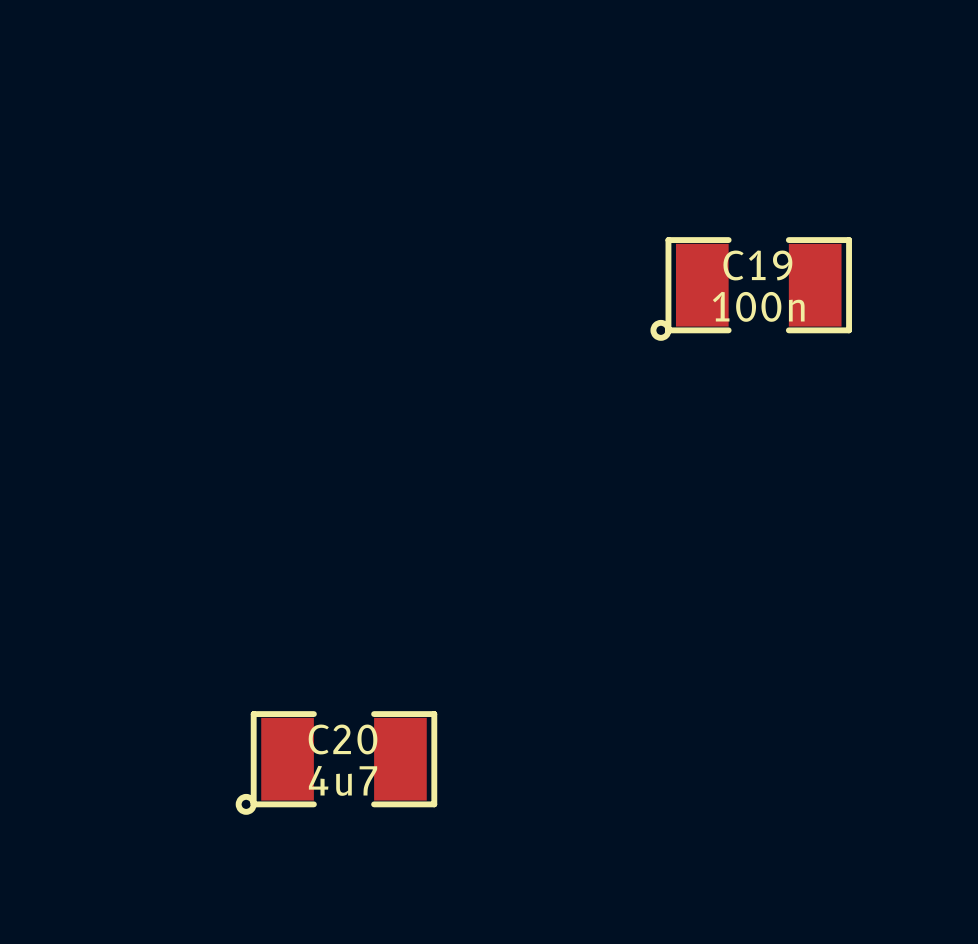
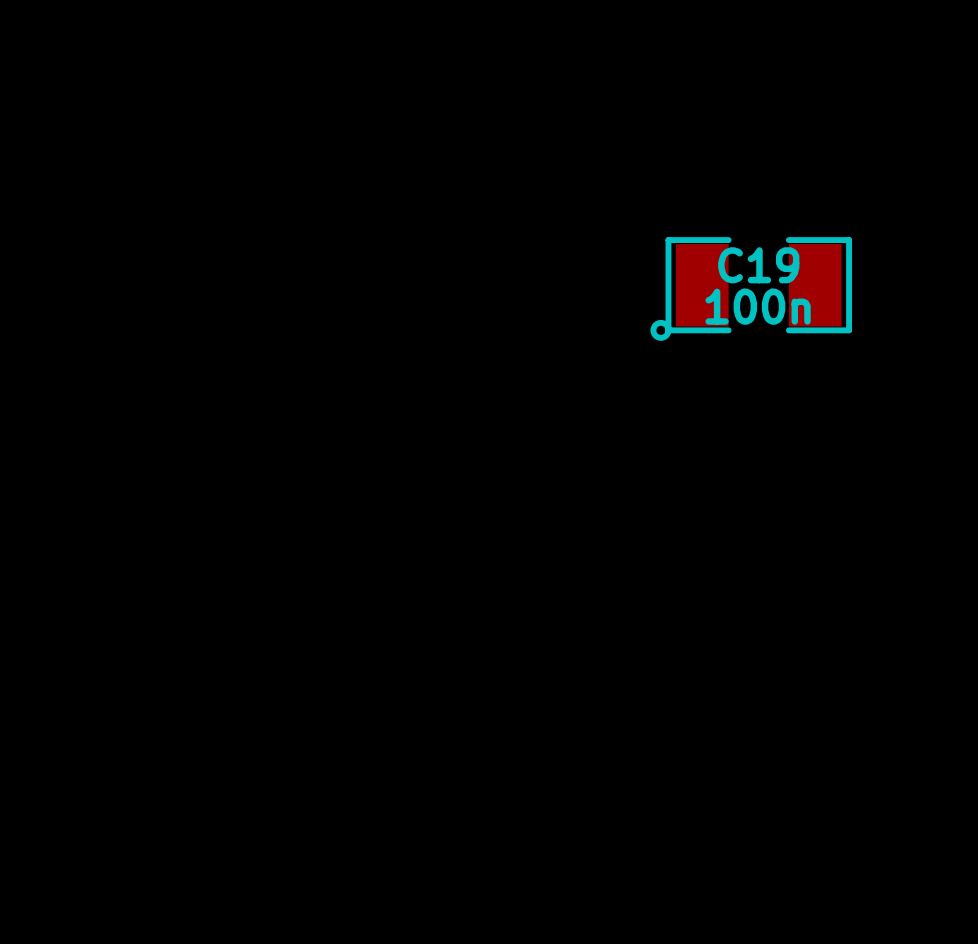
C20: 4u7 (336, 762) -> none

